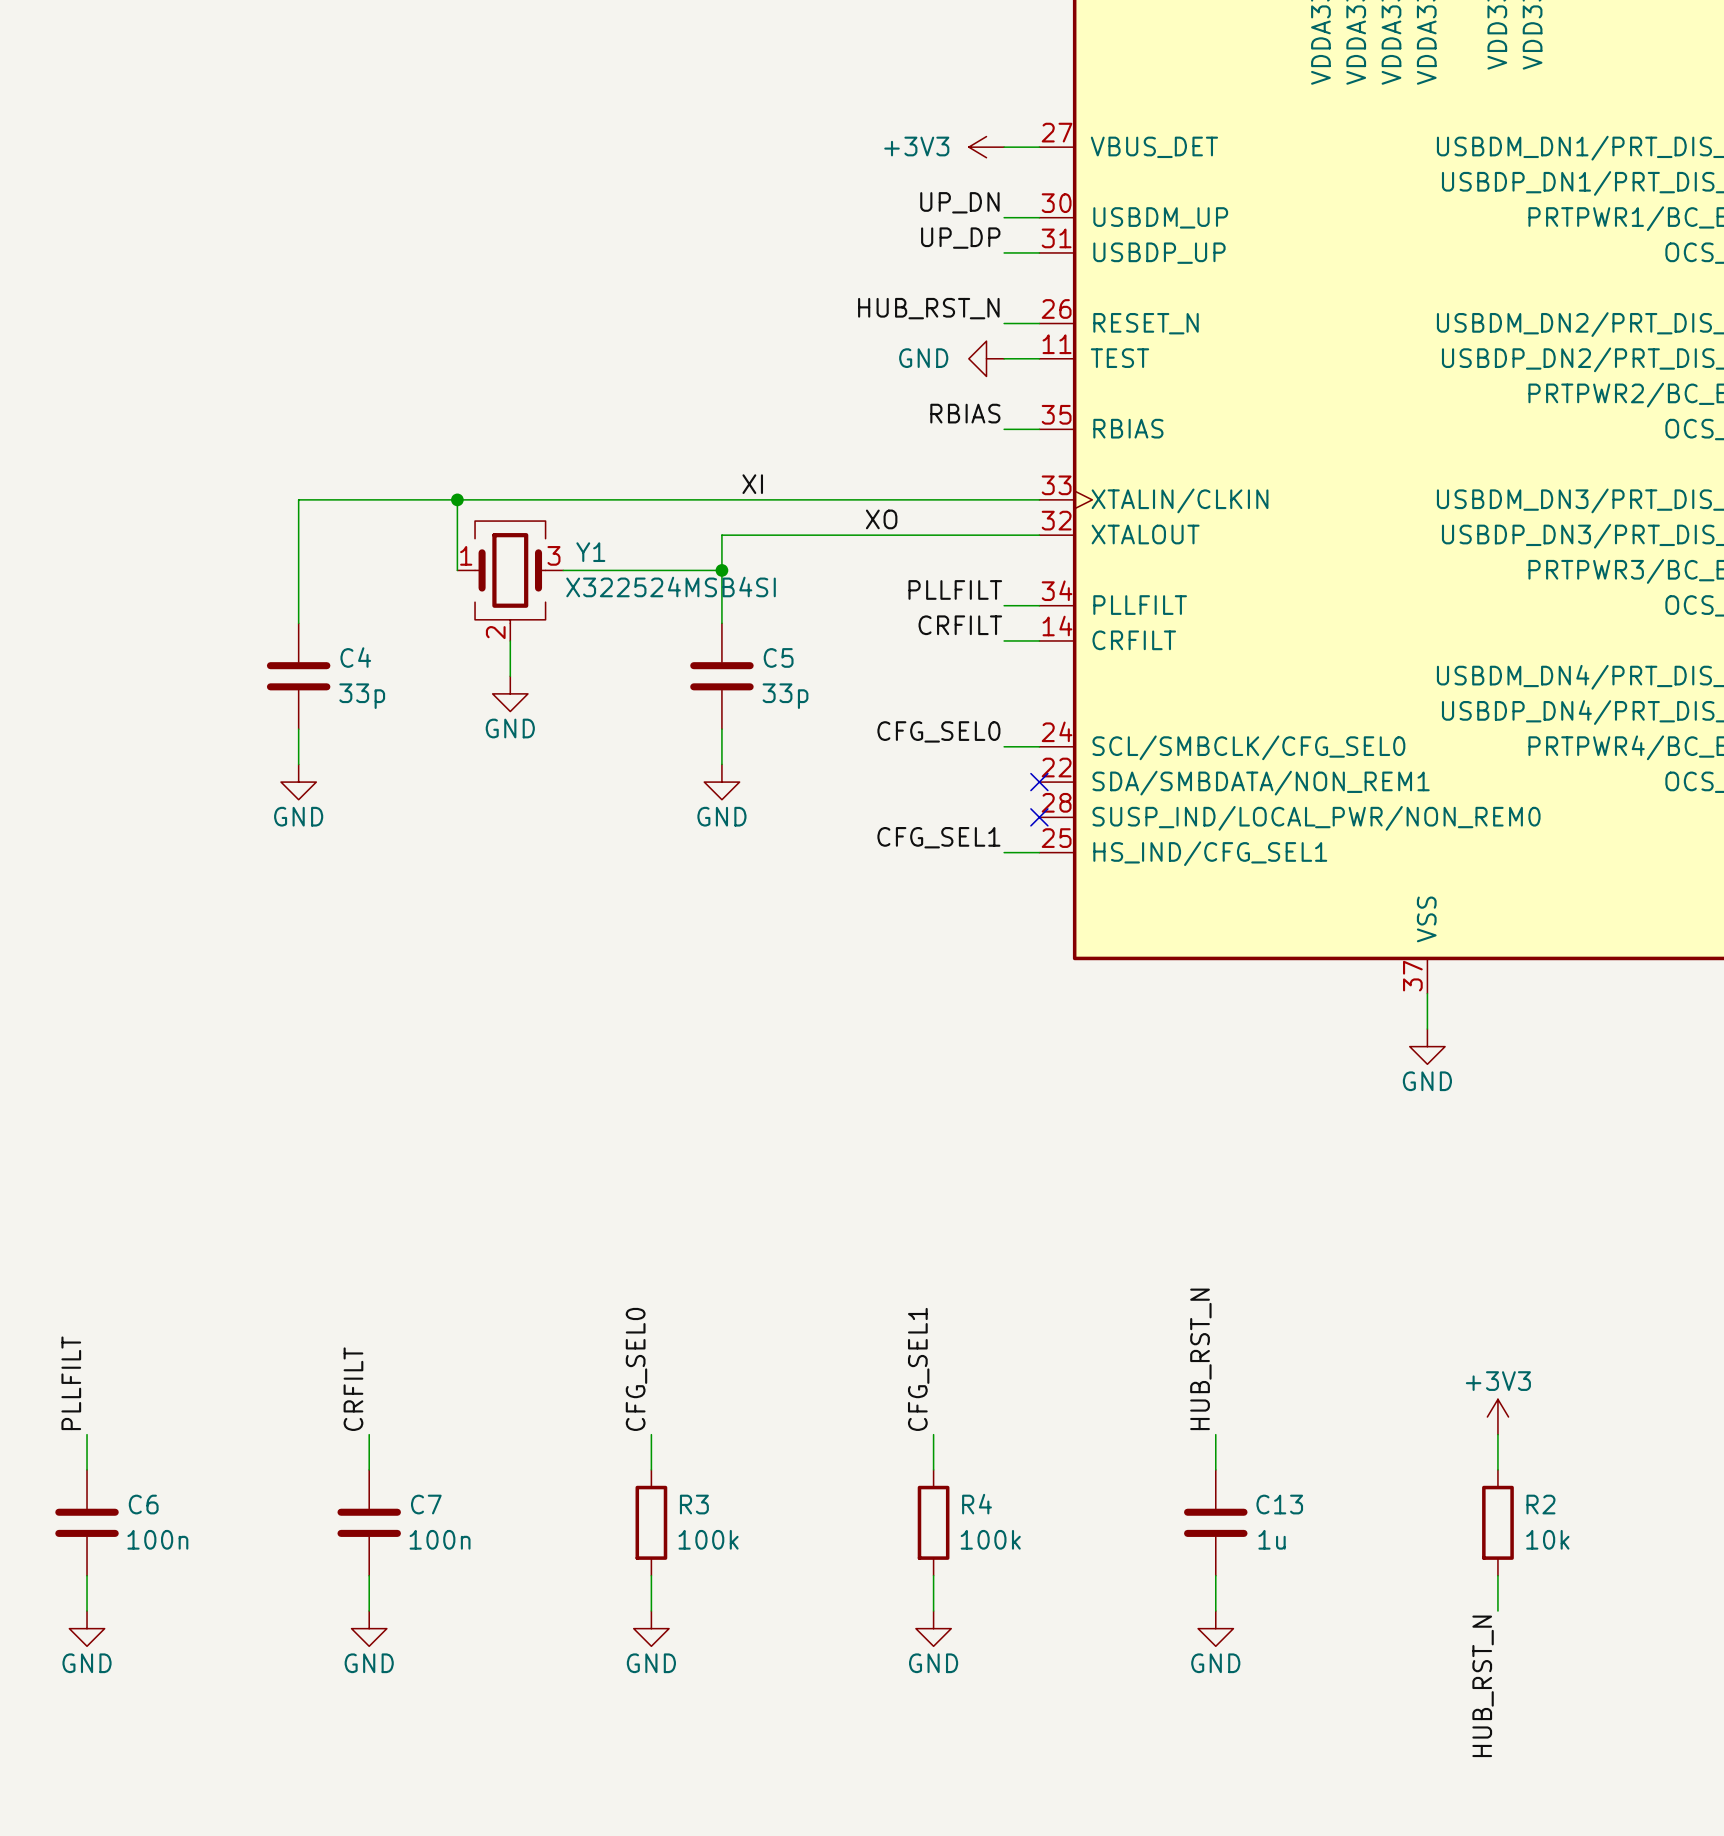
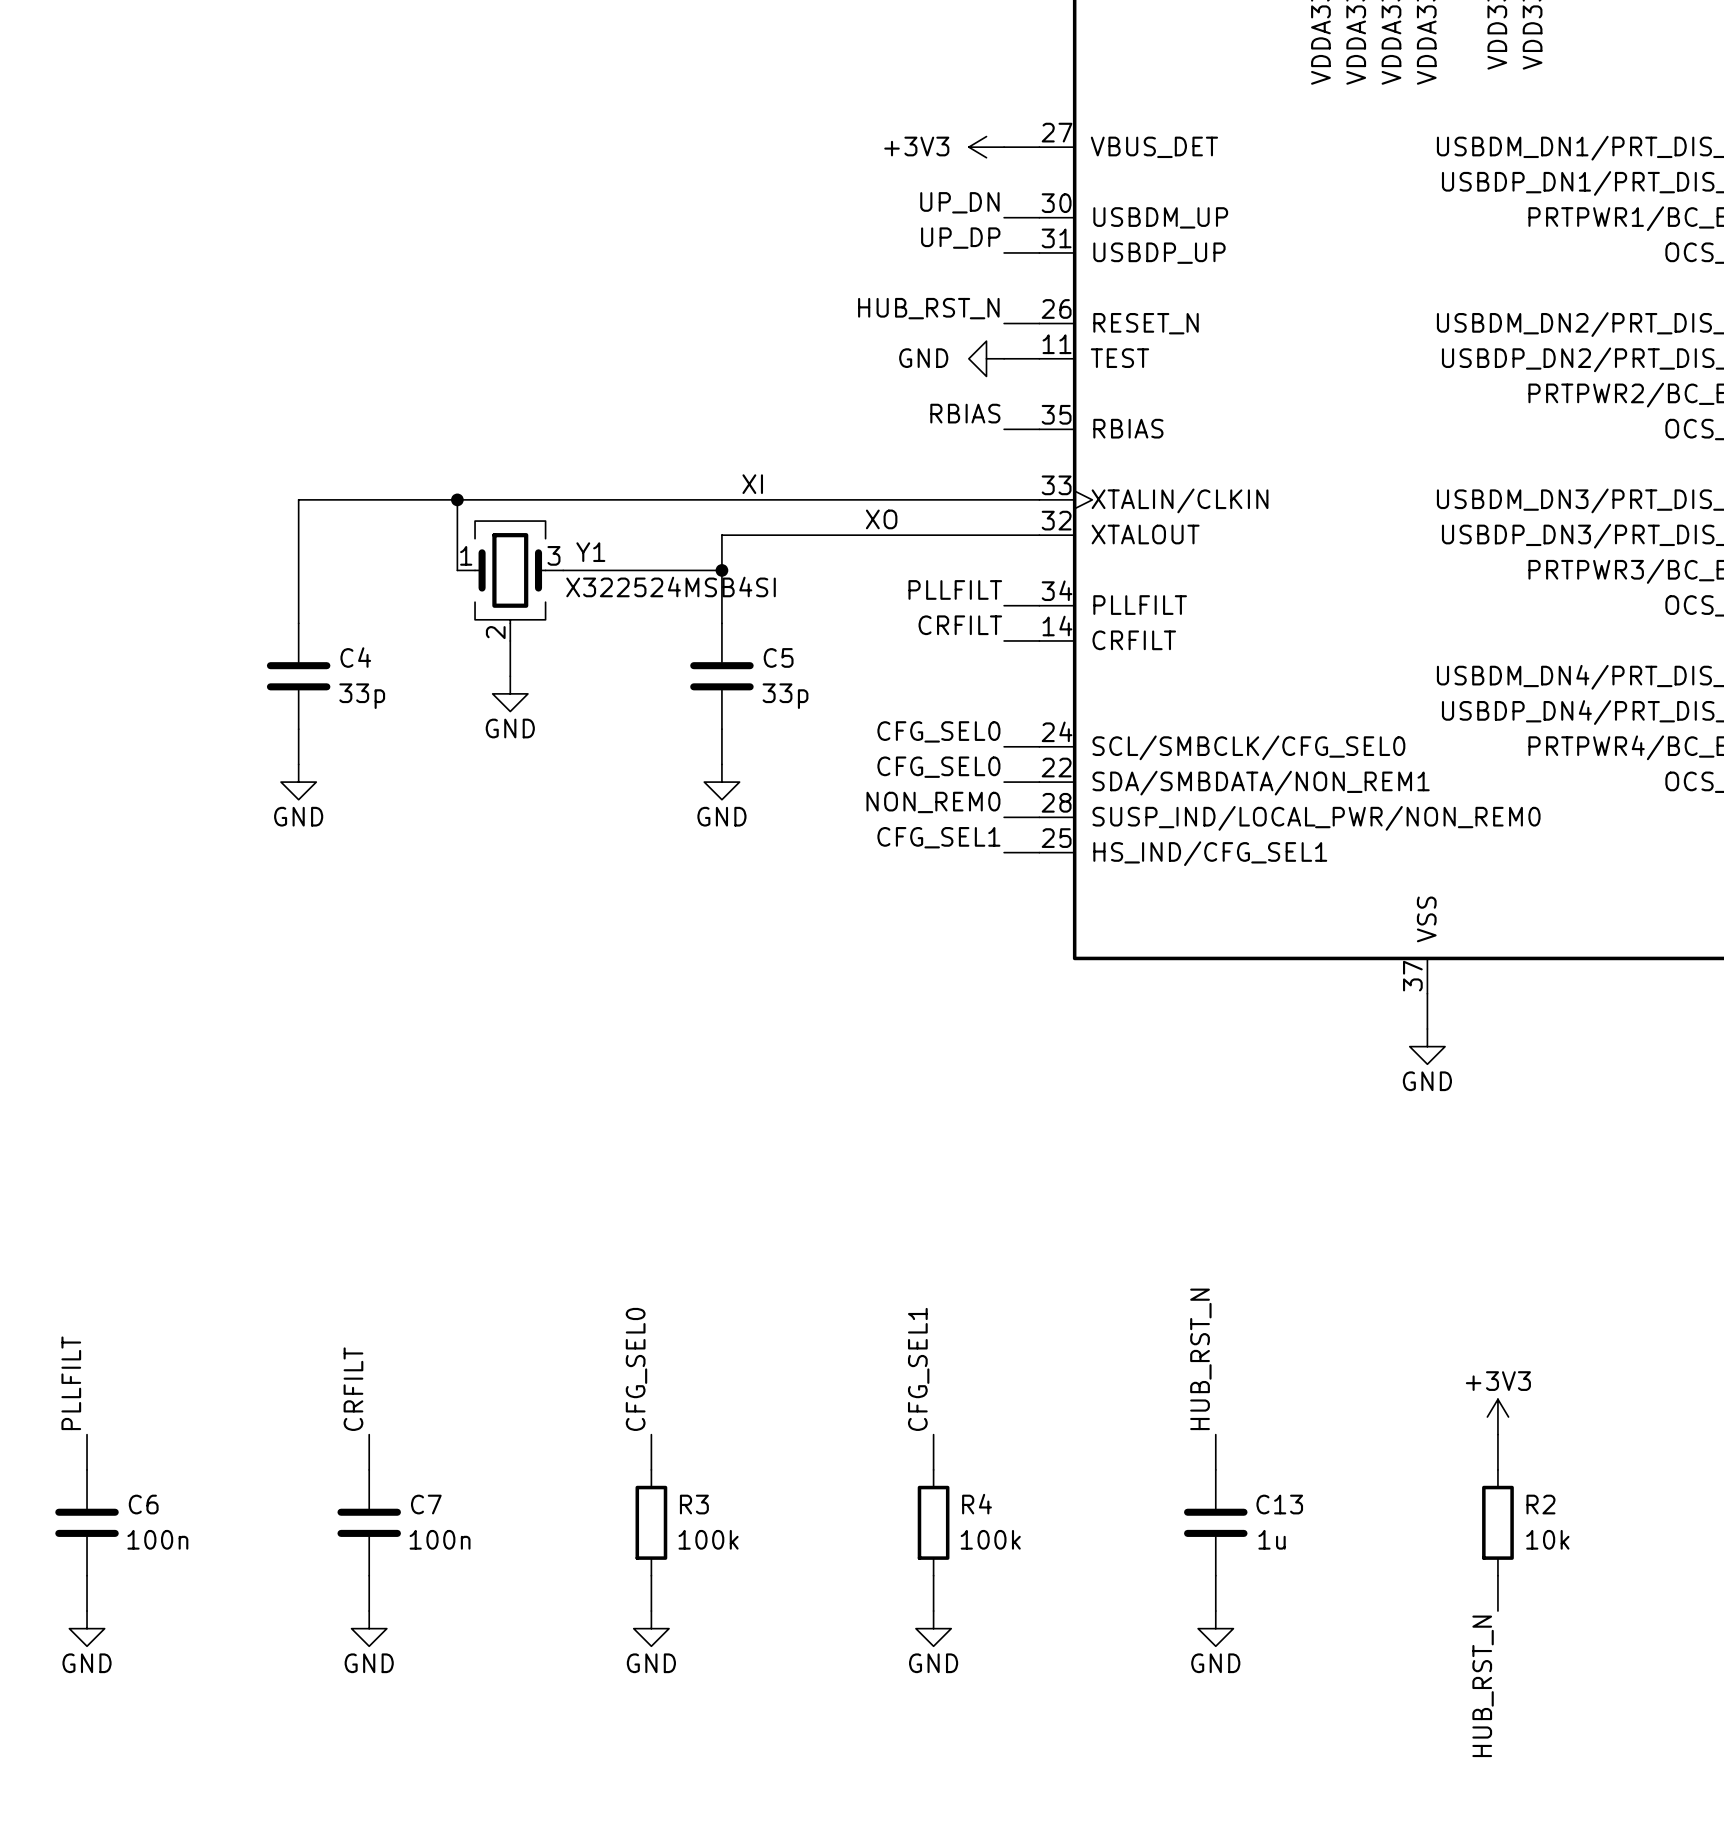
label: none -> CFG_SEL0 (938, 767)
wire: none -> (1004, 782) (1039, 782)
no-connect mark: (1039, 782) -> none
label: none -> NON_REM0 (933, 802)
wire: none -> (1004, 817) (1039, 817)
no-connect mark: (1039, 817) -> none

